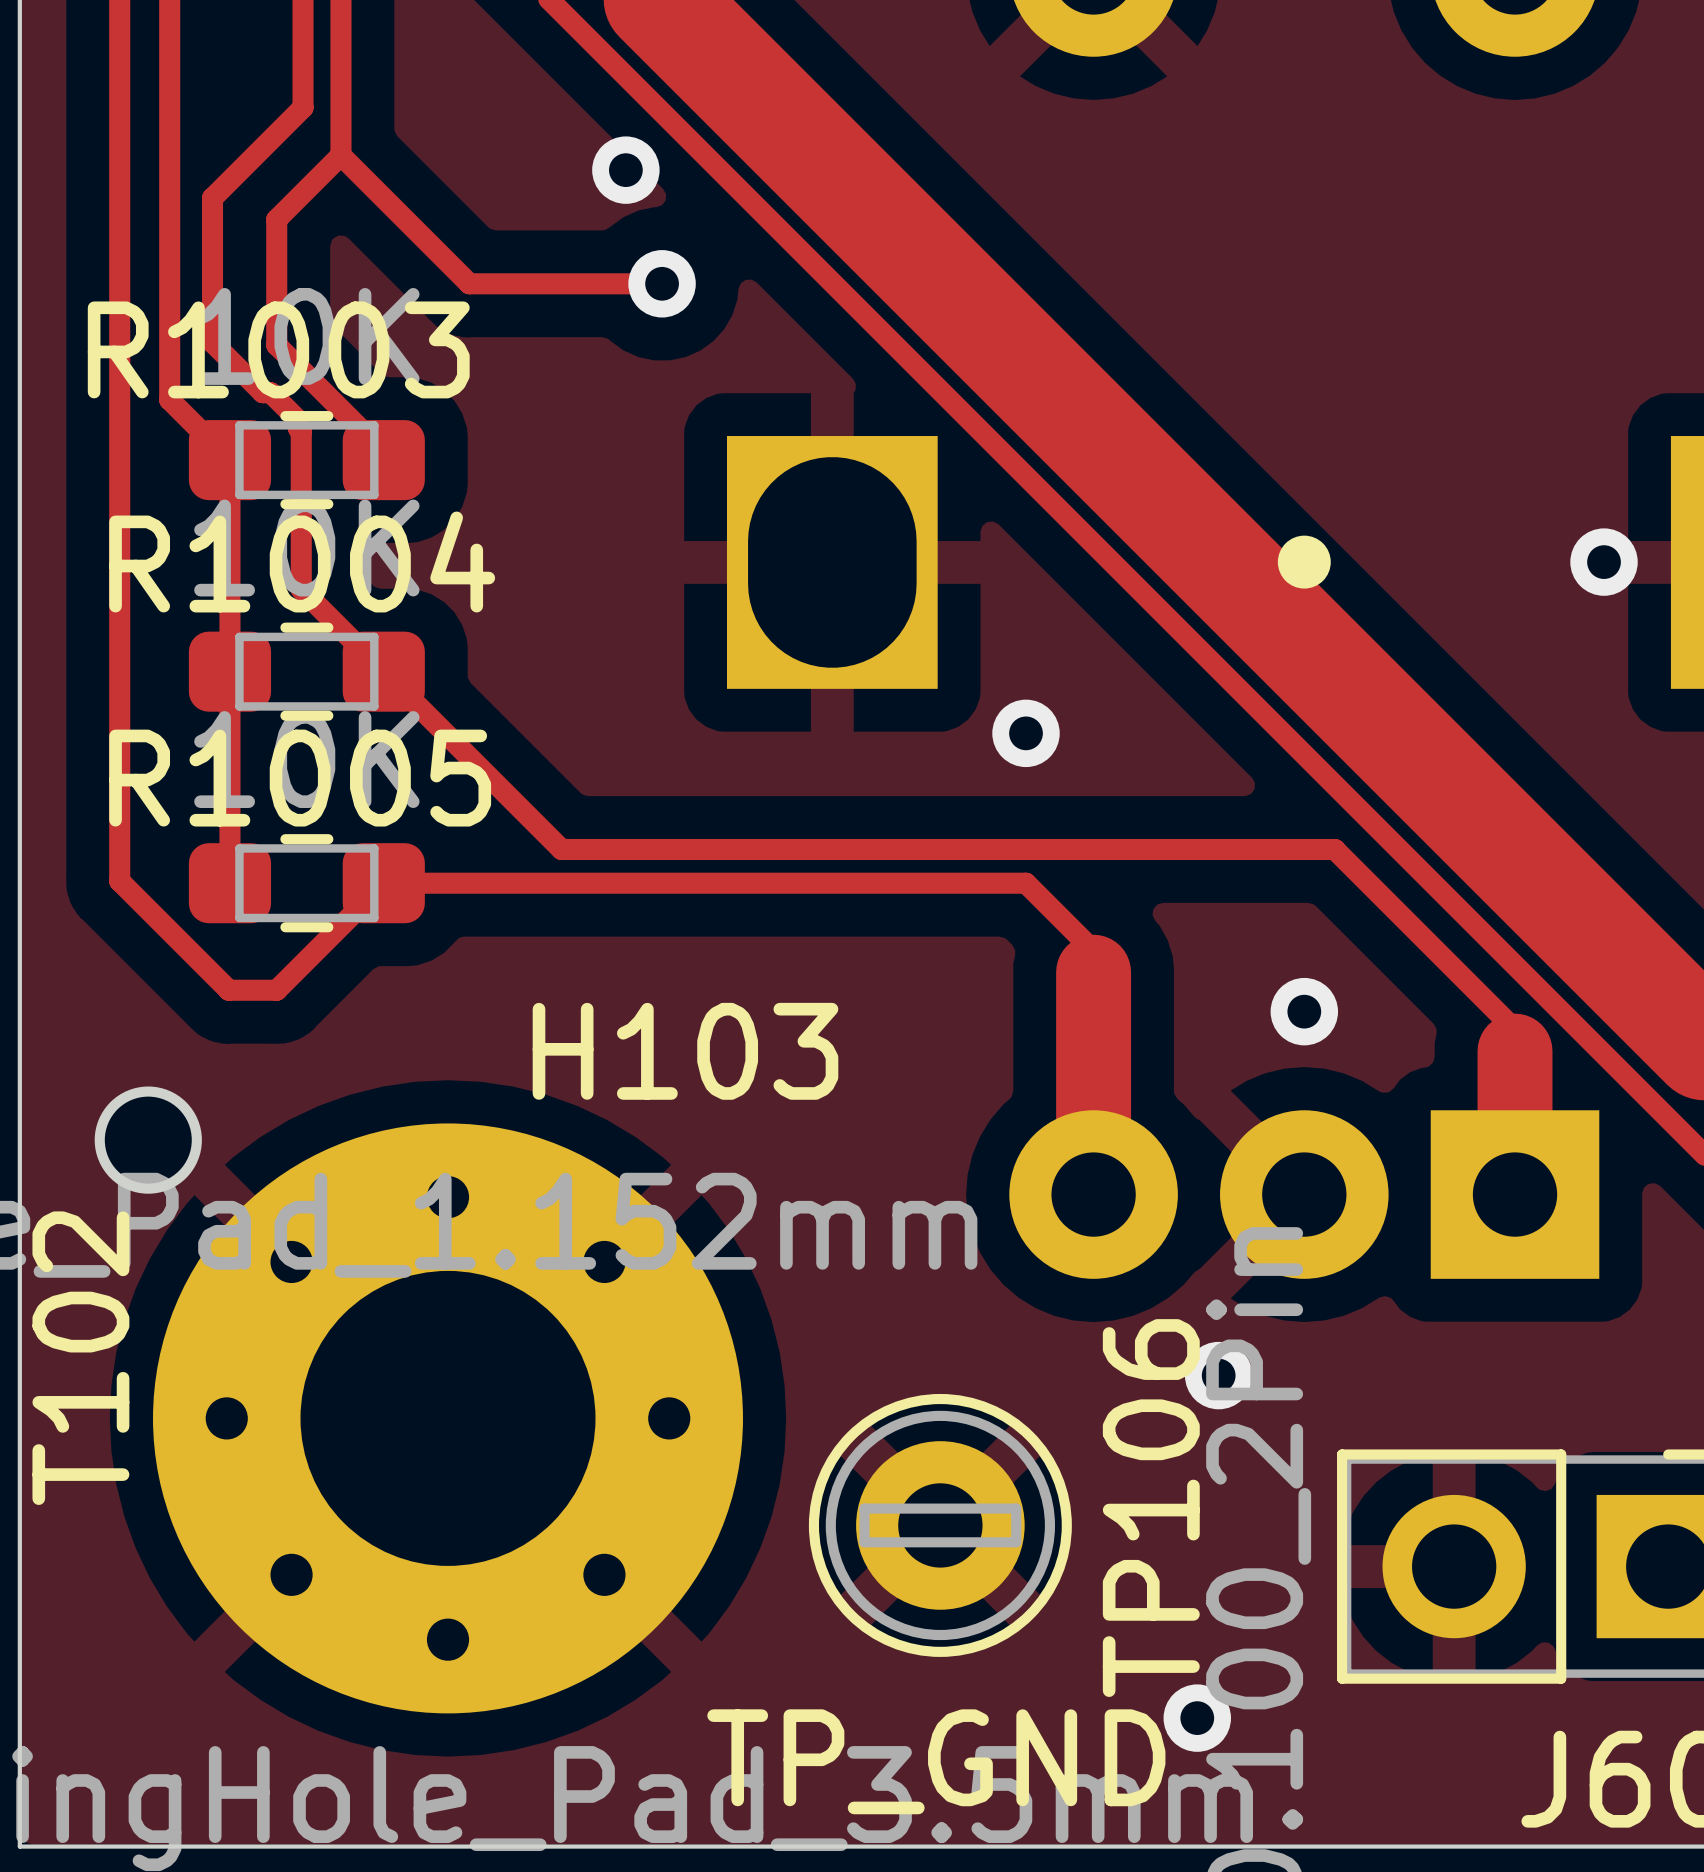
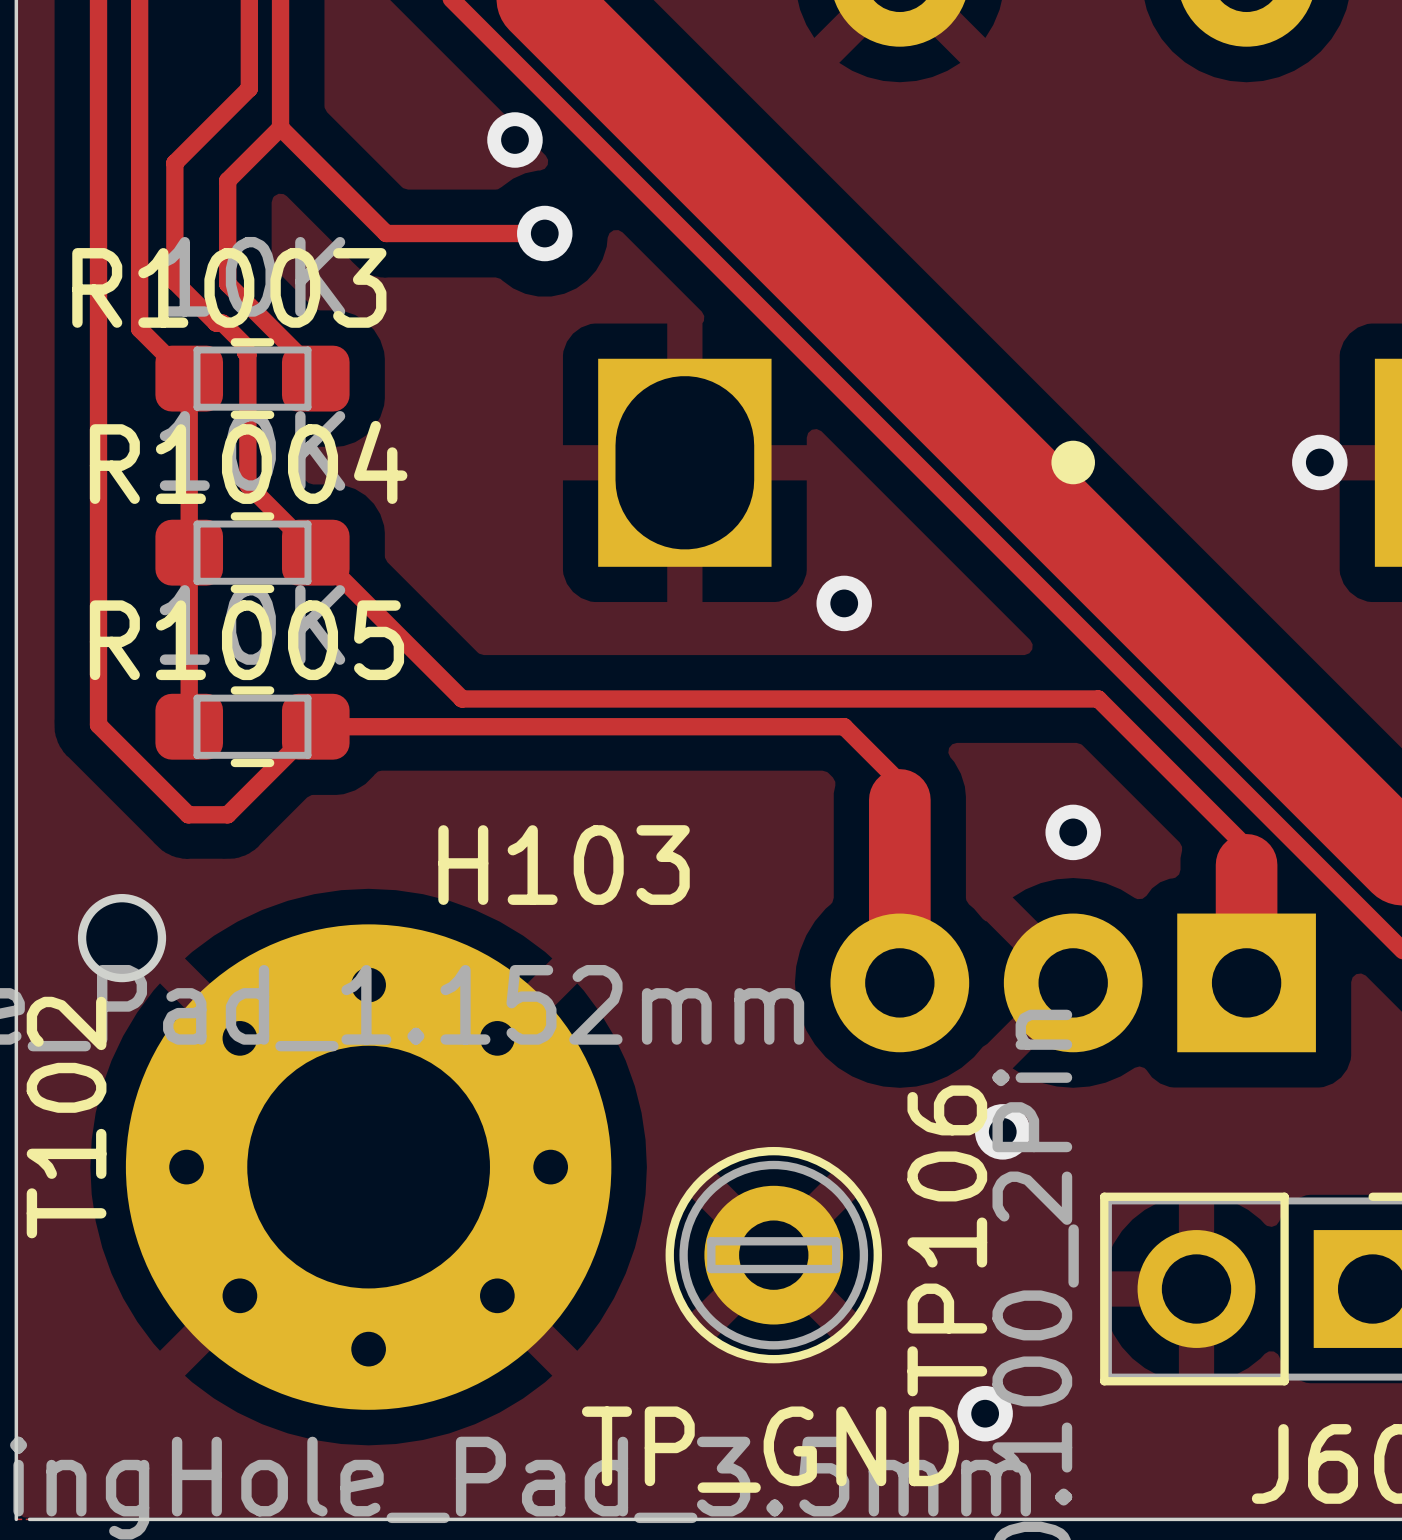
board edge: (19, 1846) (35, 1846) -> none

